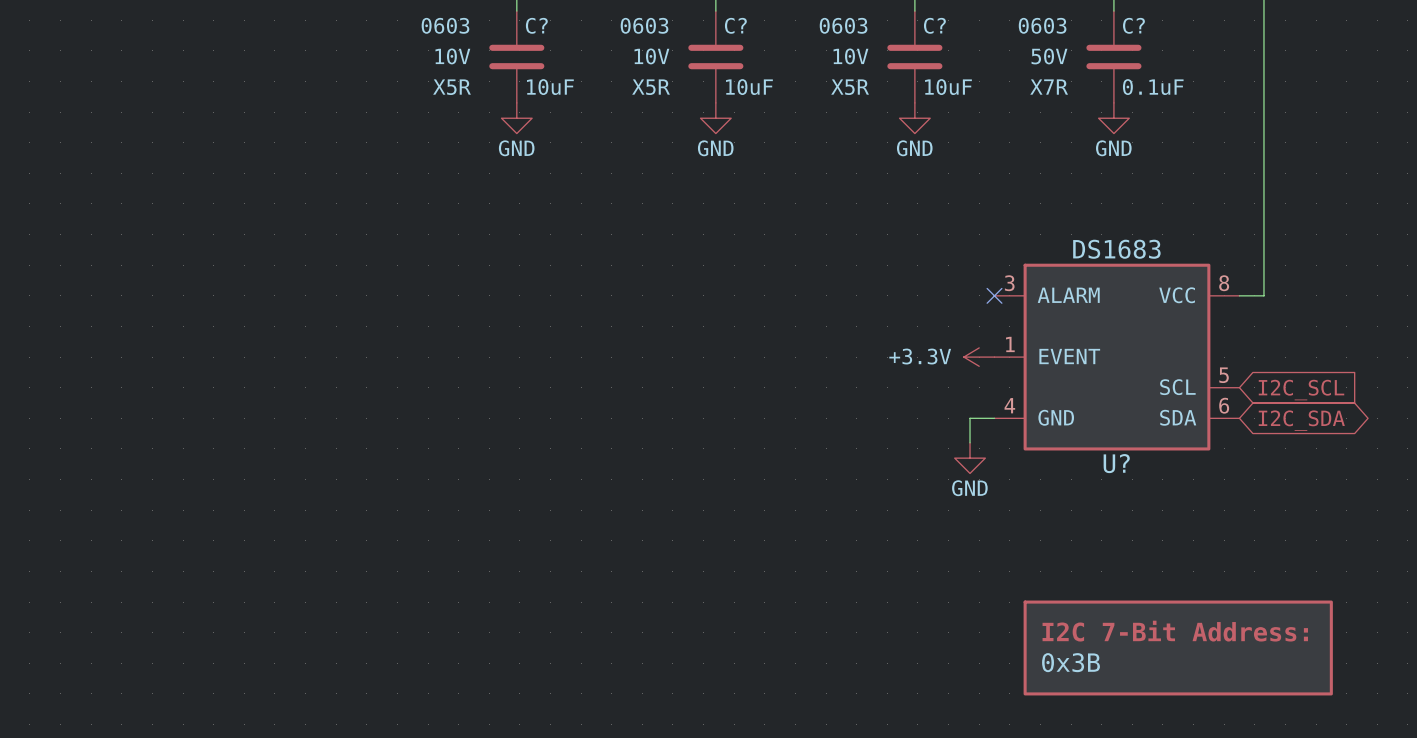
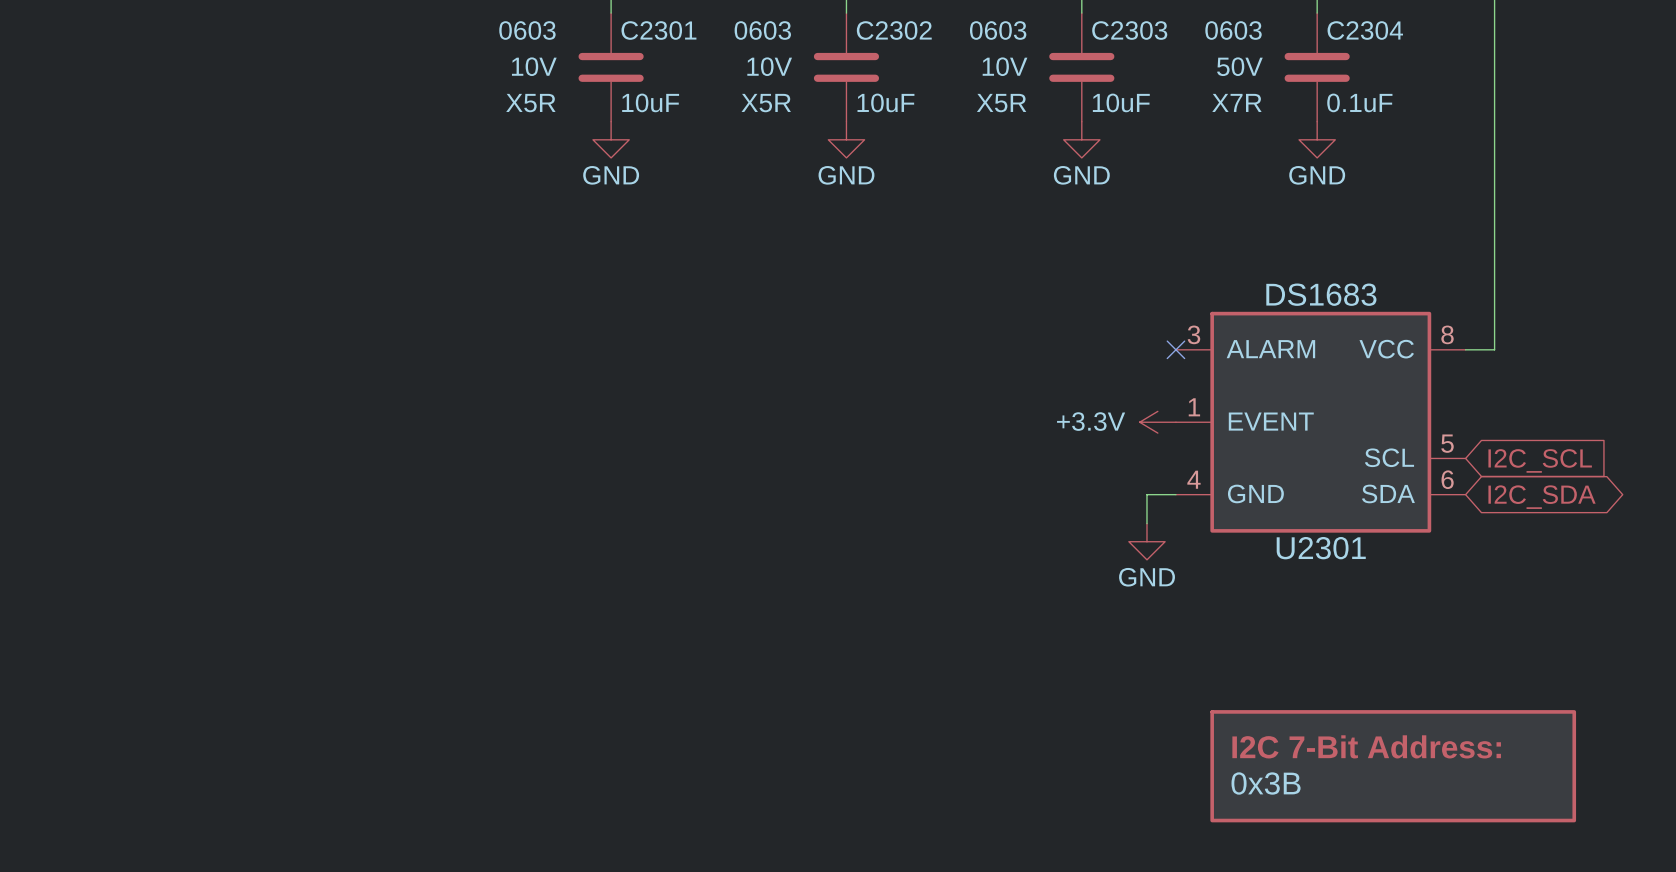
C? name: C? (536, 25) -> C2301 (658, 30)
C? name: C? (735, 25) -> C2302 (894, 30)
C? name: C? (934, 25) -> C2303 (1129, 30)
C? name: C? (1133, 25) -> C2304 (1365, 30)
U? name: U? (1116, 463) -> U2301 (1321, 548)

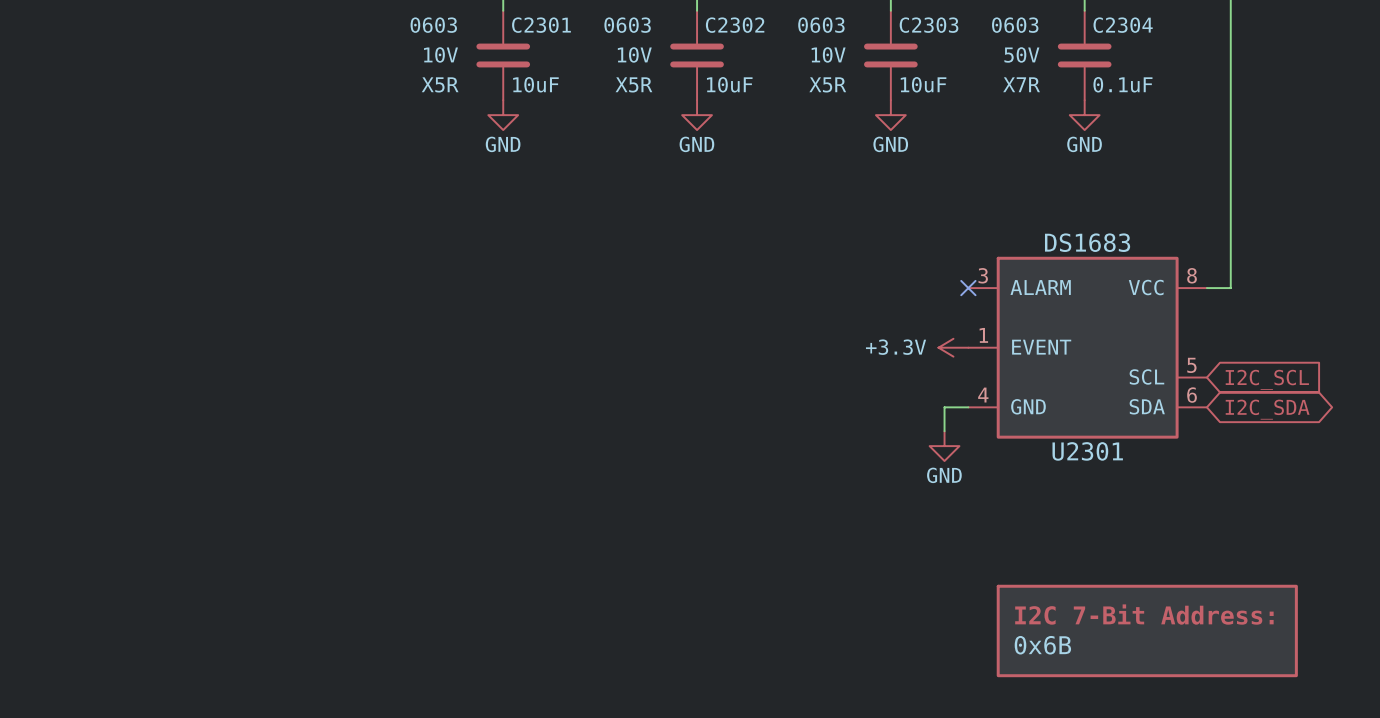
part value: 0x3B (1266, 783) -> 0x6B (1042, 645)

